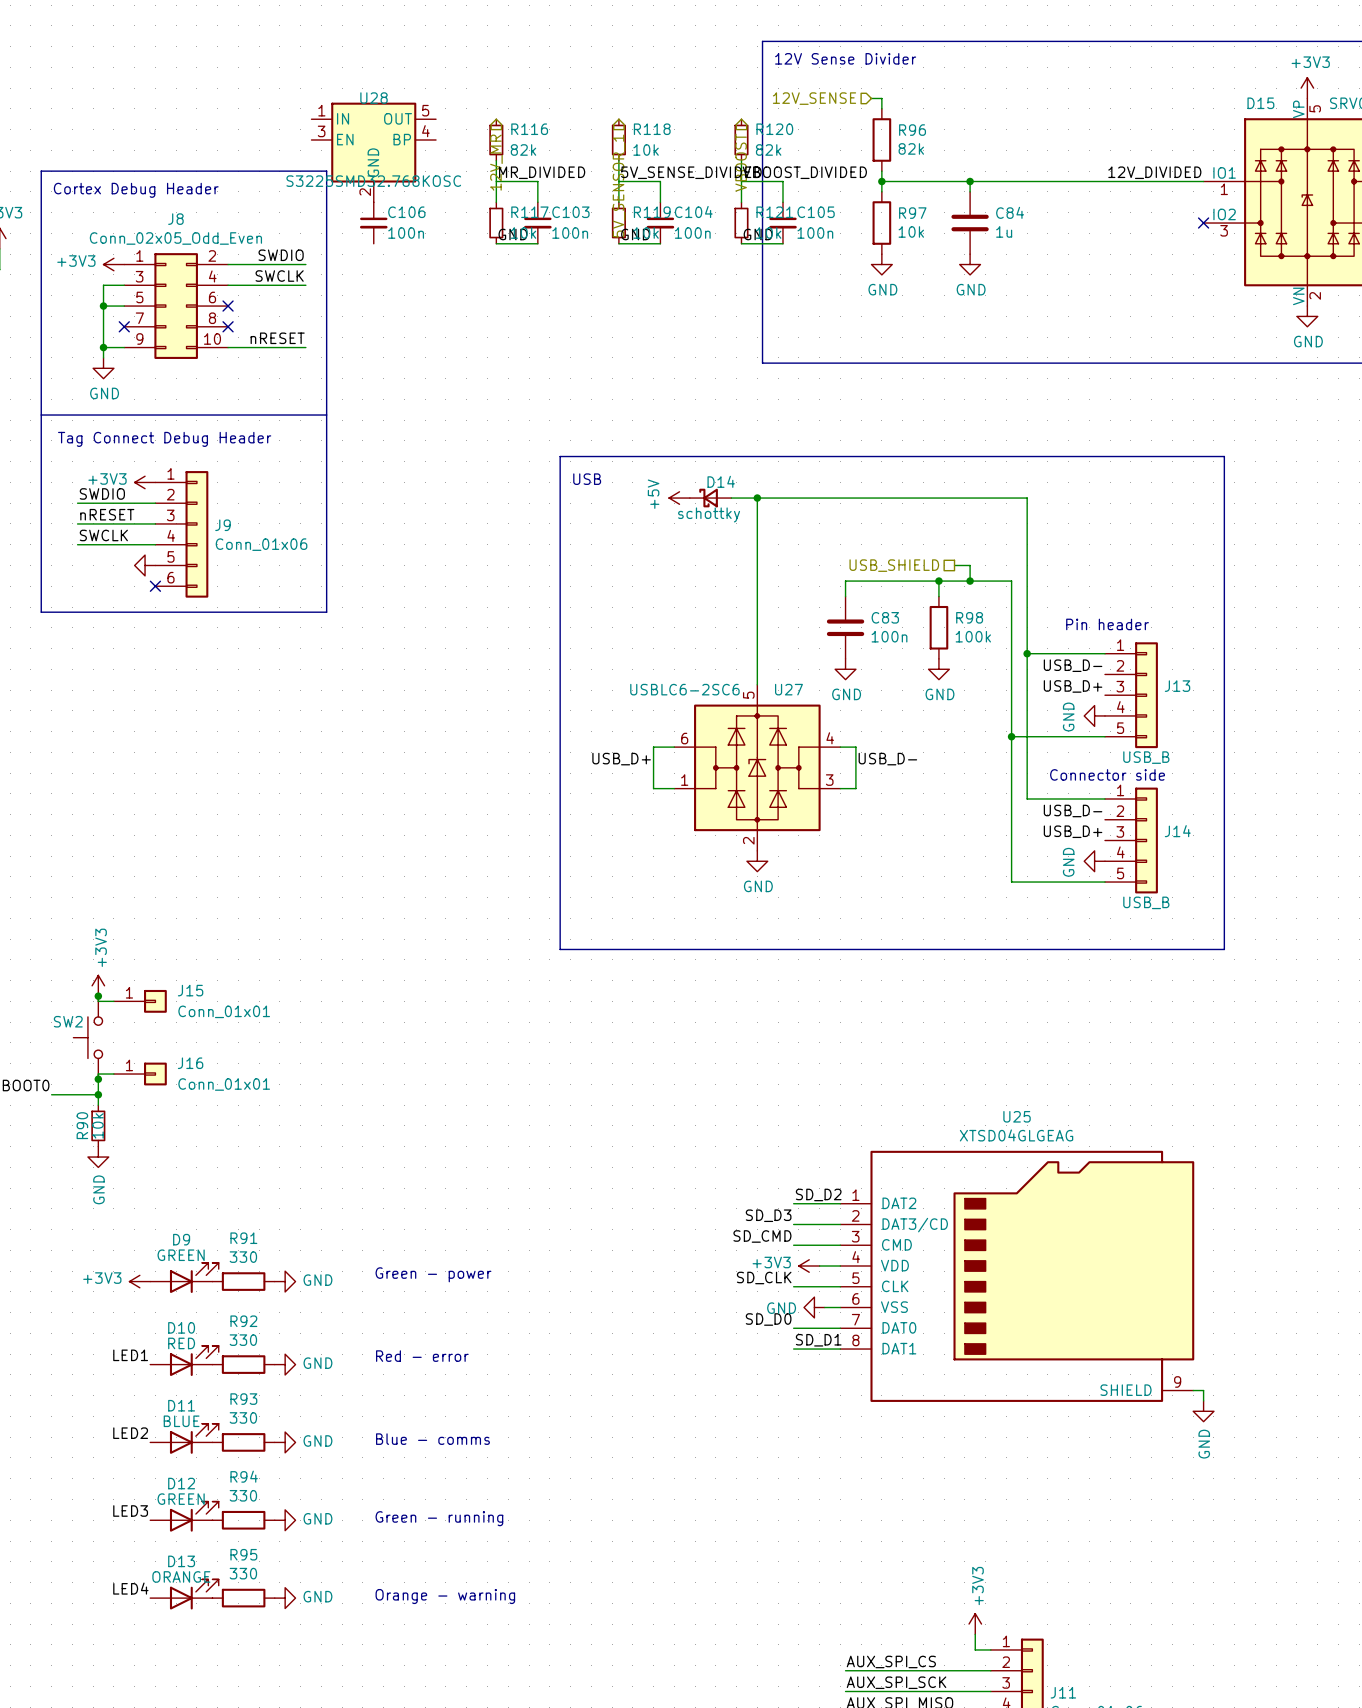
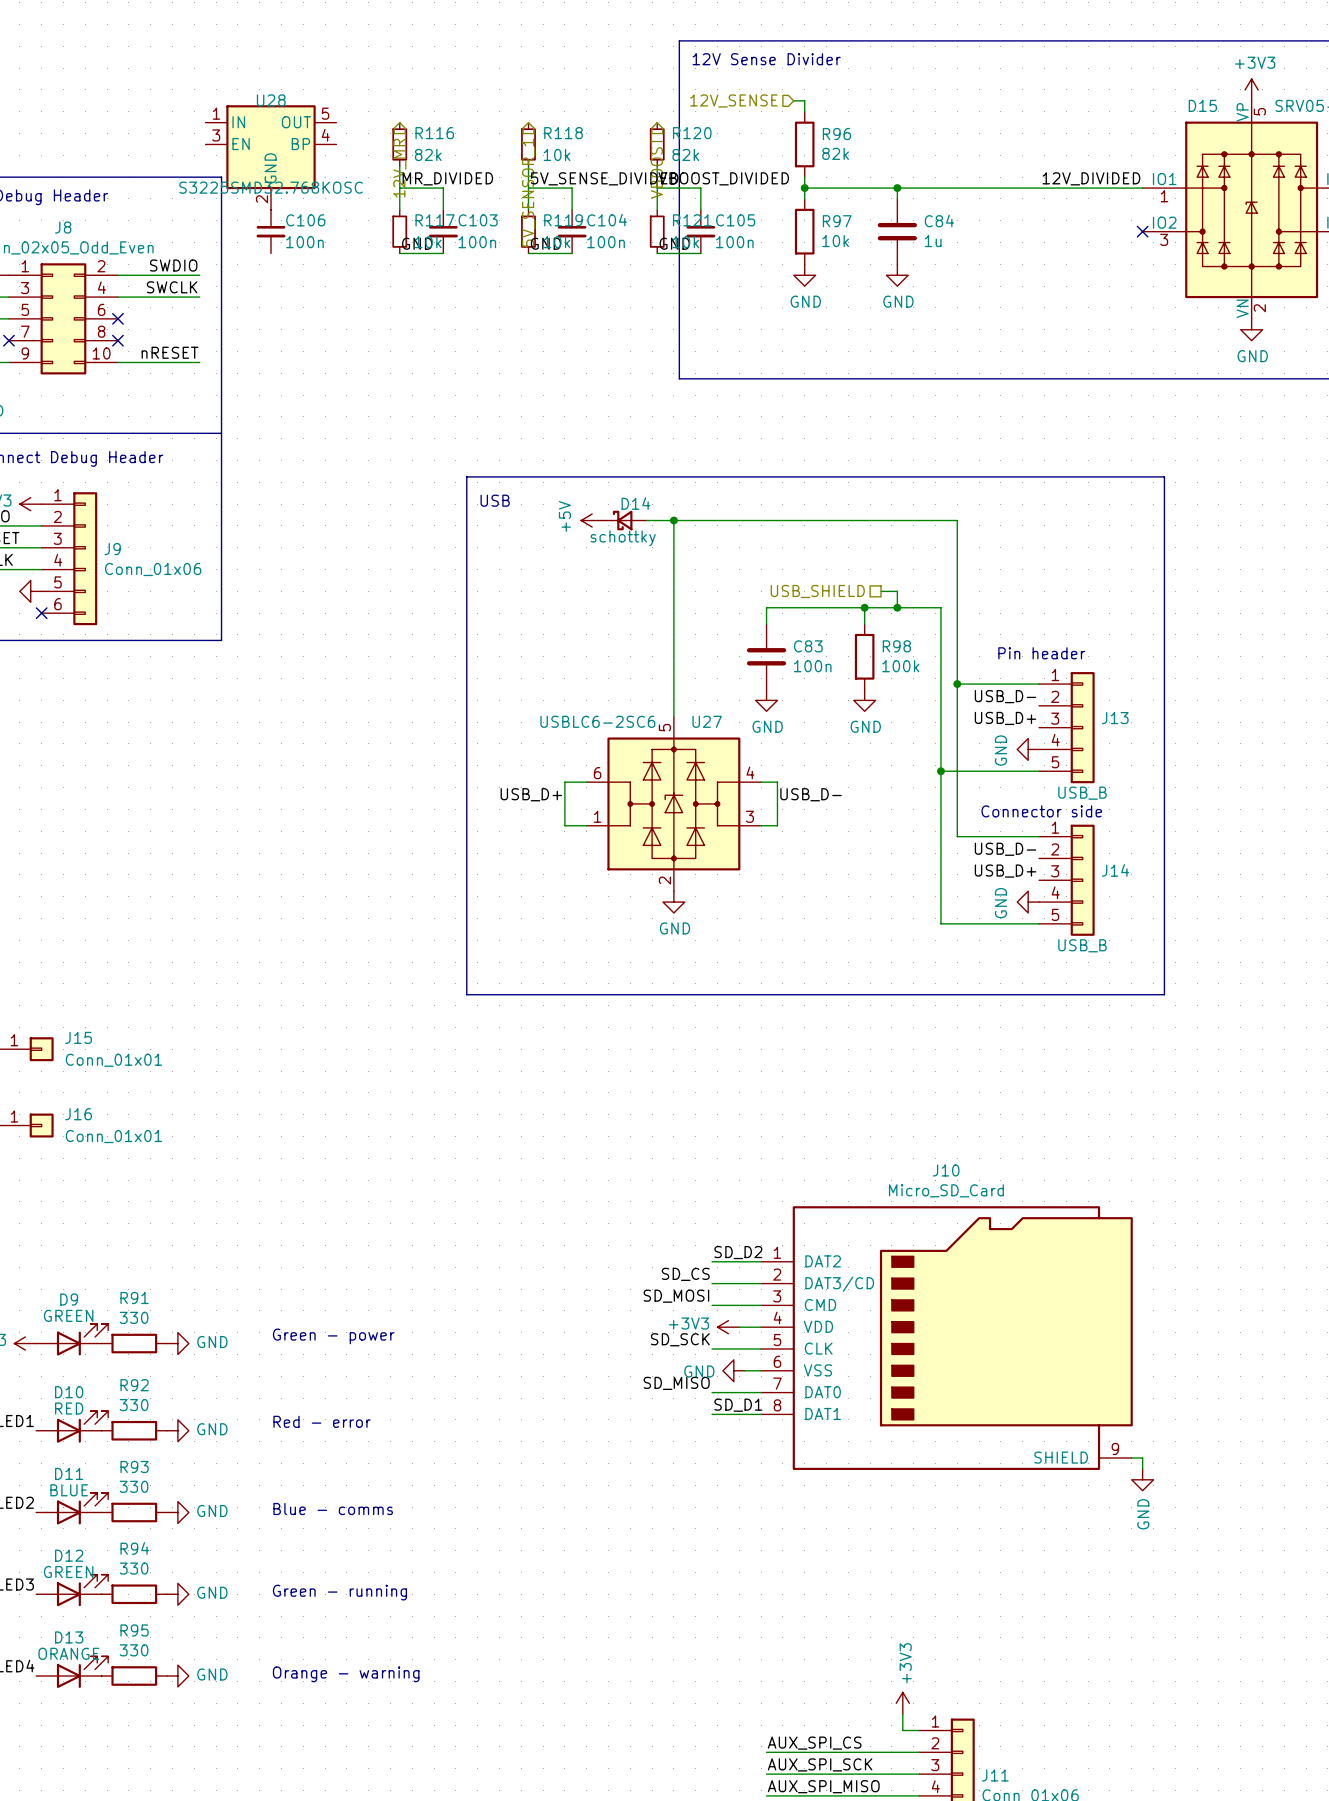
U25 name: U25 (1017, 1116) -> J10 (946, 1170)
U25 value: XTSD04GLGEAG (1016, 1135) -> Micro_SD_Card (946, 1190)
label: SD_D3 (768, 1215) -> SD_CS (685, 1274)
label: SD_CMD (762, 1236) -> SD_MOSI (676, 1296)
label: SD_CLK (764, 1277) -> SD_SCK (680, 1339)
label: SD_D0 (768, 1319) -> SD_MISO (676, 1383)

